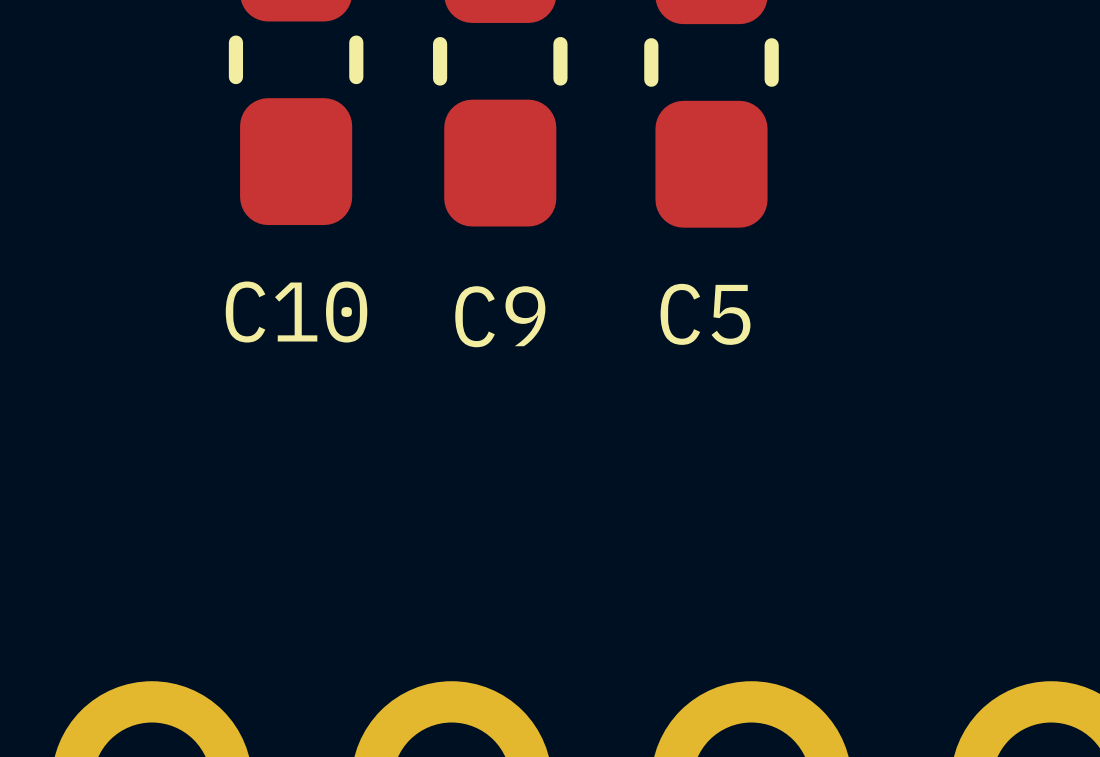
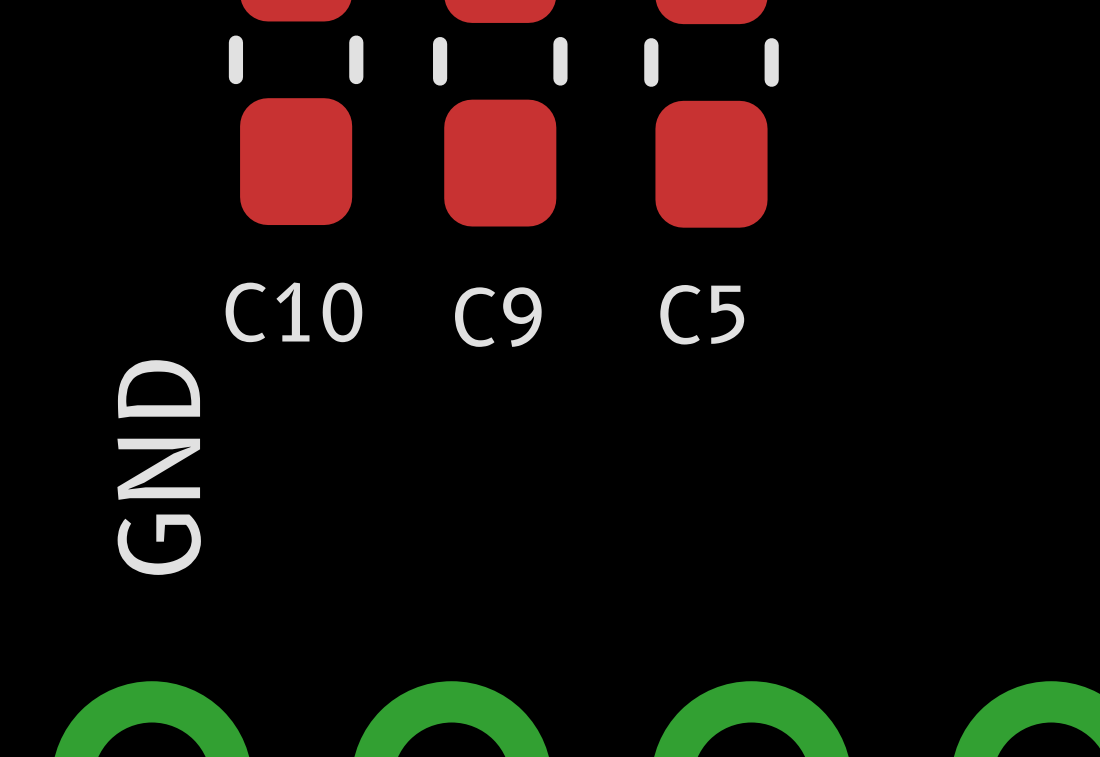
text: none -> GND (159, 467)

